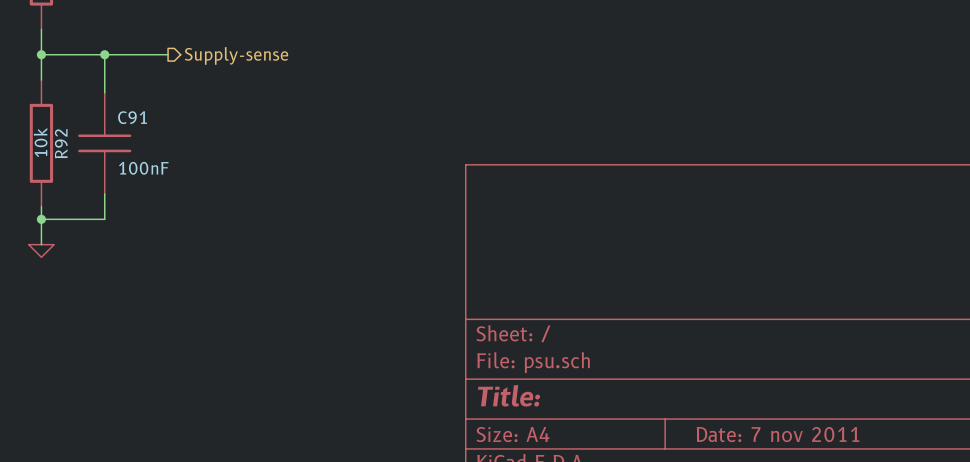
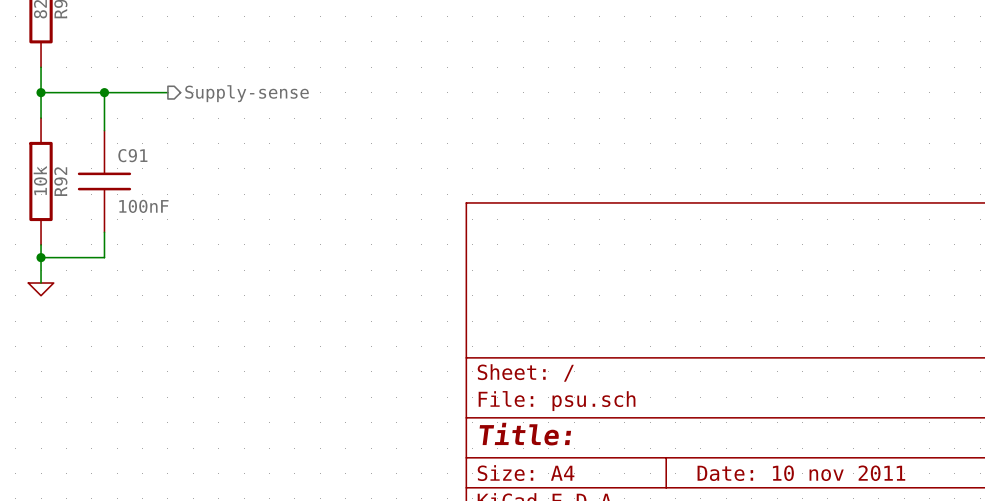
title block: Date: 7 nov 2011 (778, 434) -> Date: 10 nov 2011 (801, 473)

